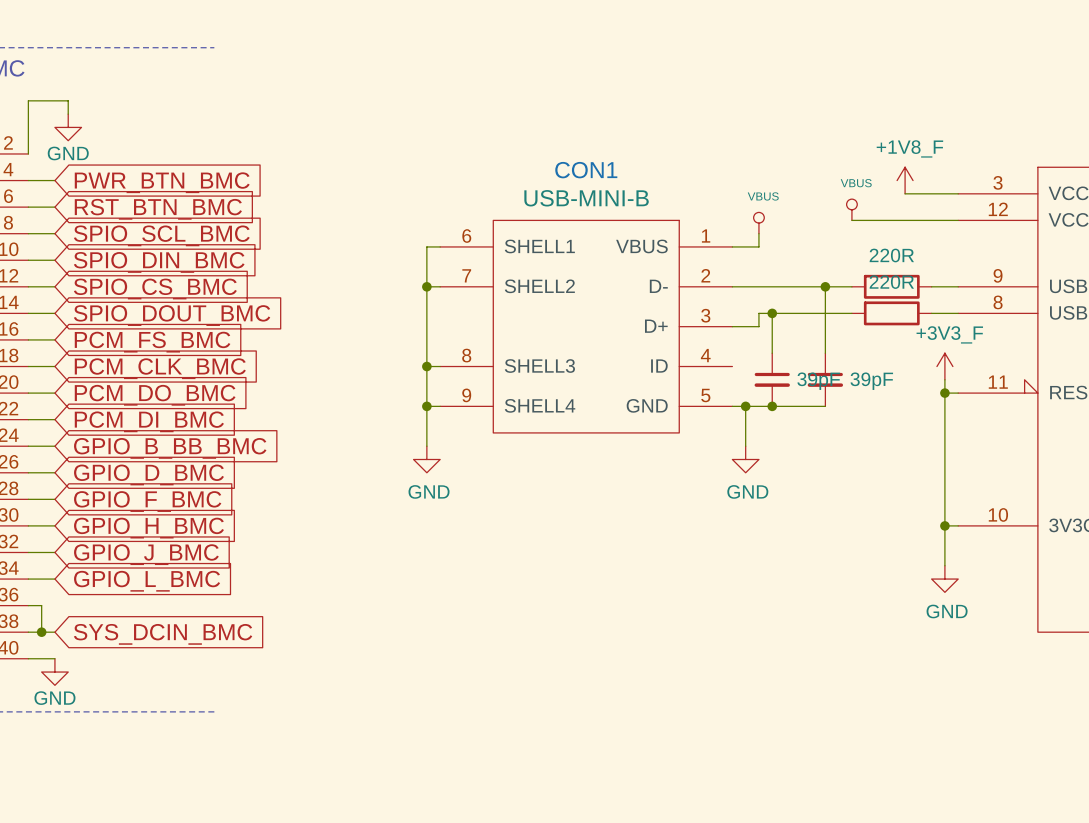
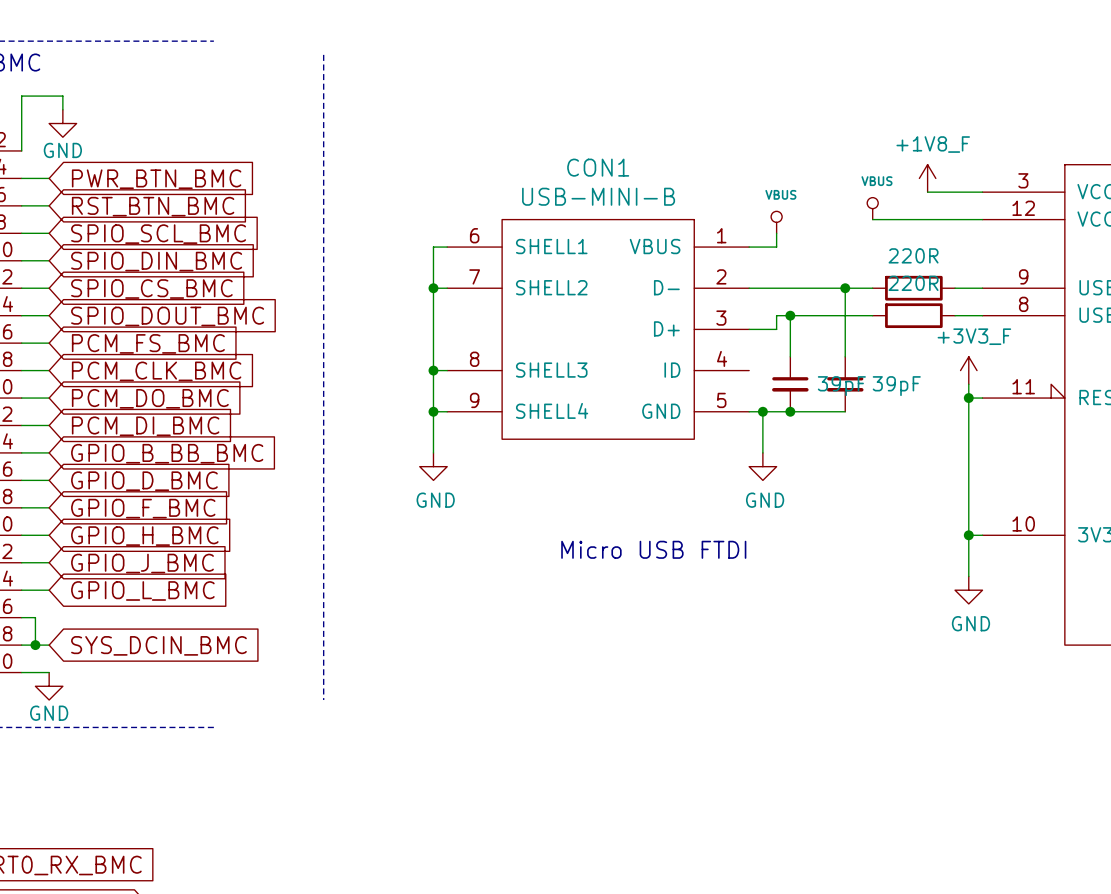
line: none -> (323, 54) (323, 700)
text: none -> Micro USB FTDI (653, 549)

